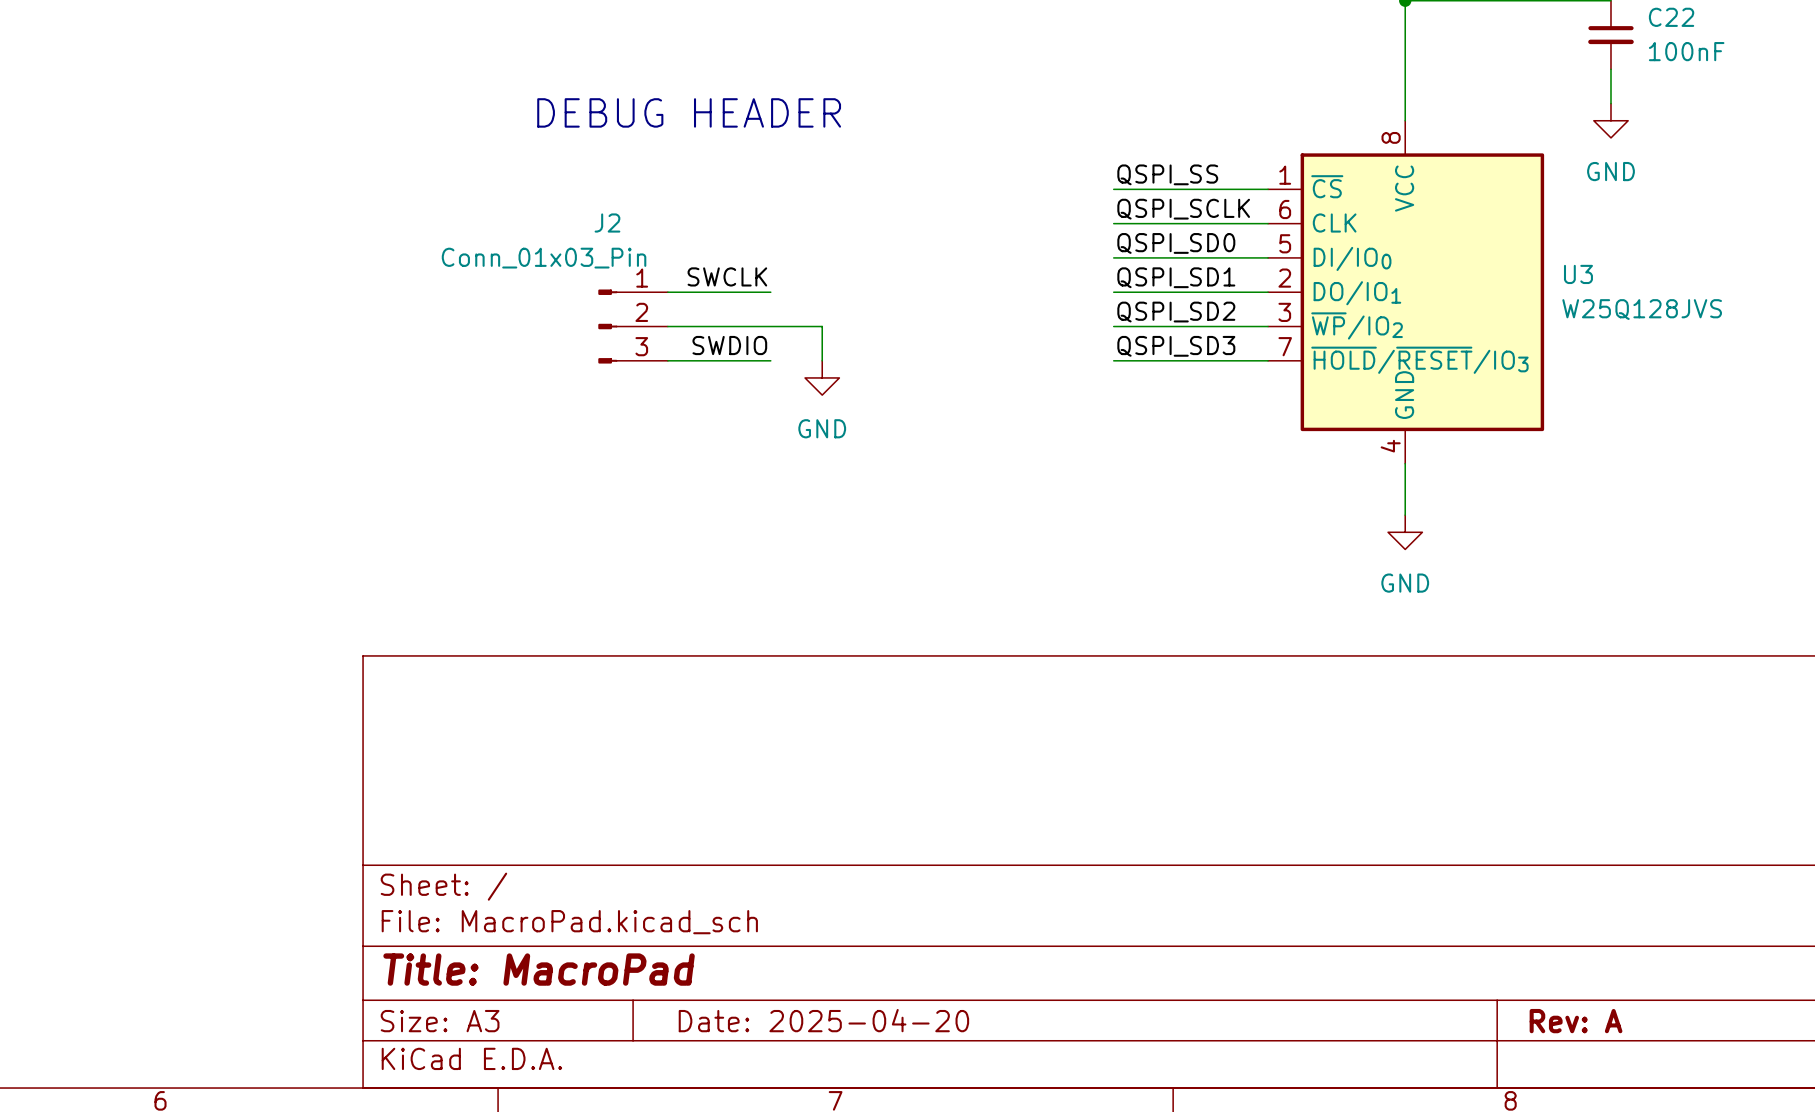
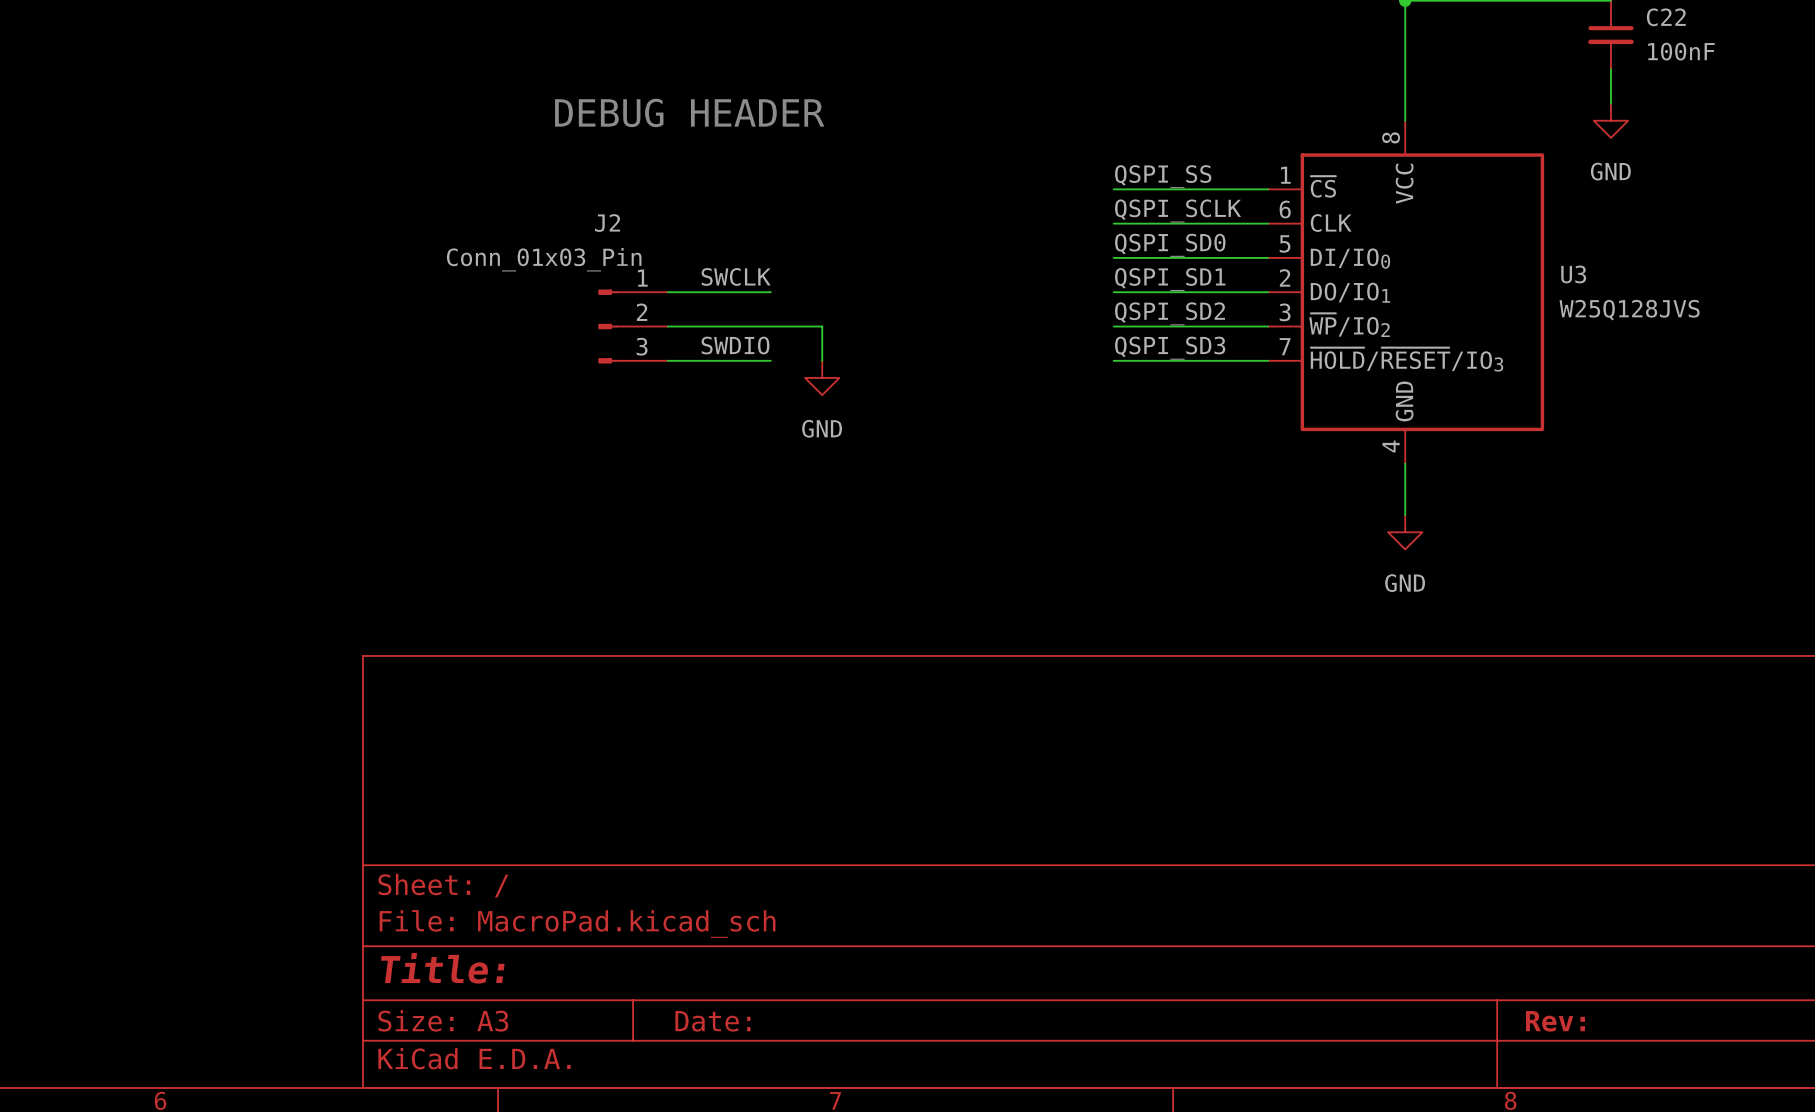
title block: Title: MacroPad (539, 969) -> Title: (442, 968)
title block: Date: 2025-04-20 (823, 1020) -> Date: (712, 1021)
title block: Rev: A (1576, 1021) -> Rev: (1555, 1021)

